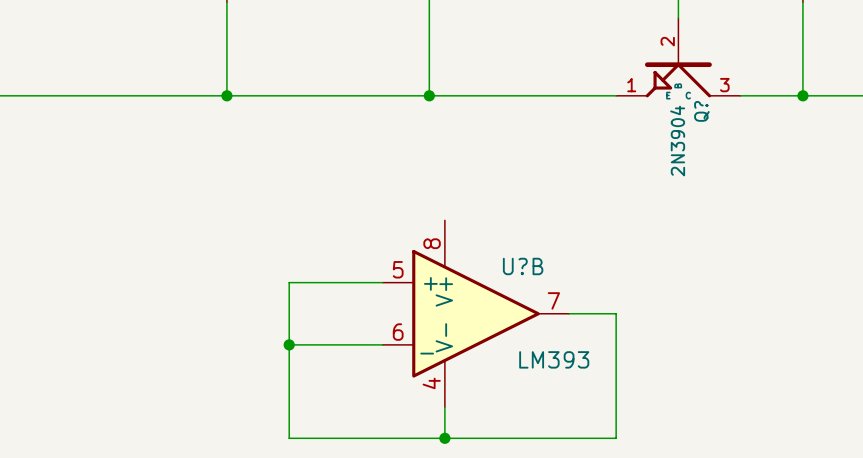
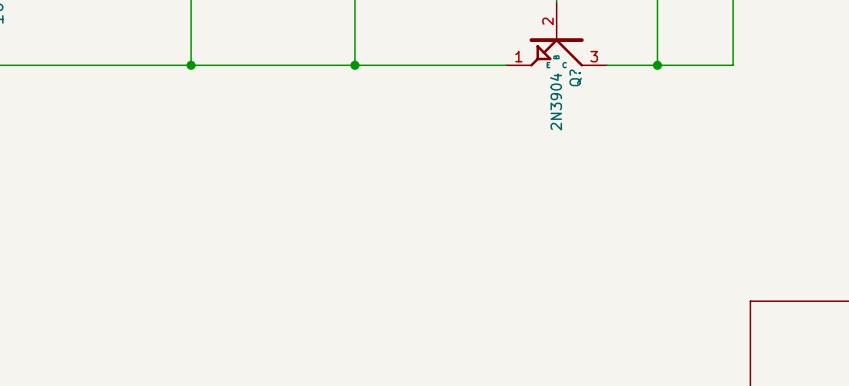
wire: (382, 282) (289, 282) (289, 438) (616, 438) (616, 313) (569, 313) -> none
U?B: LM393 (476, 313) -> none
wire: (289, 344) (382, 344) -> none
junction: (289, 344) -> none
wire: (444, 407) (444, 438) -> none
junction: (444, 438) -> none

